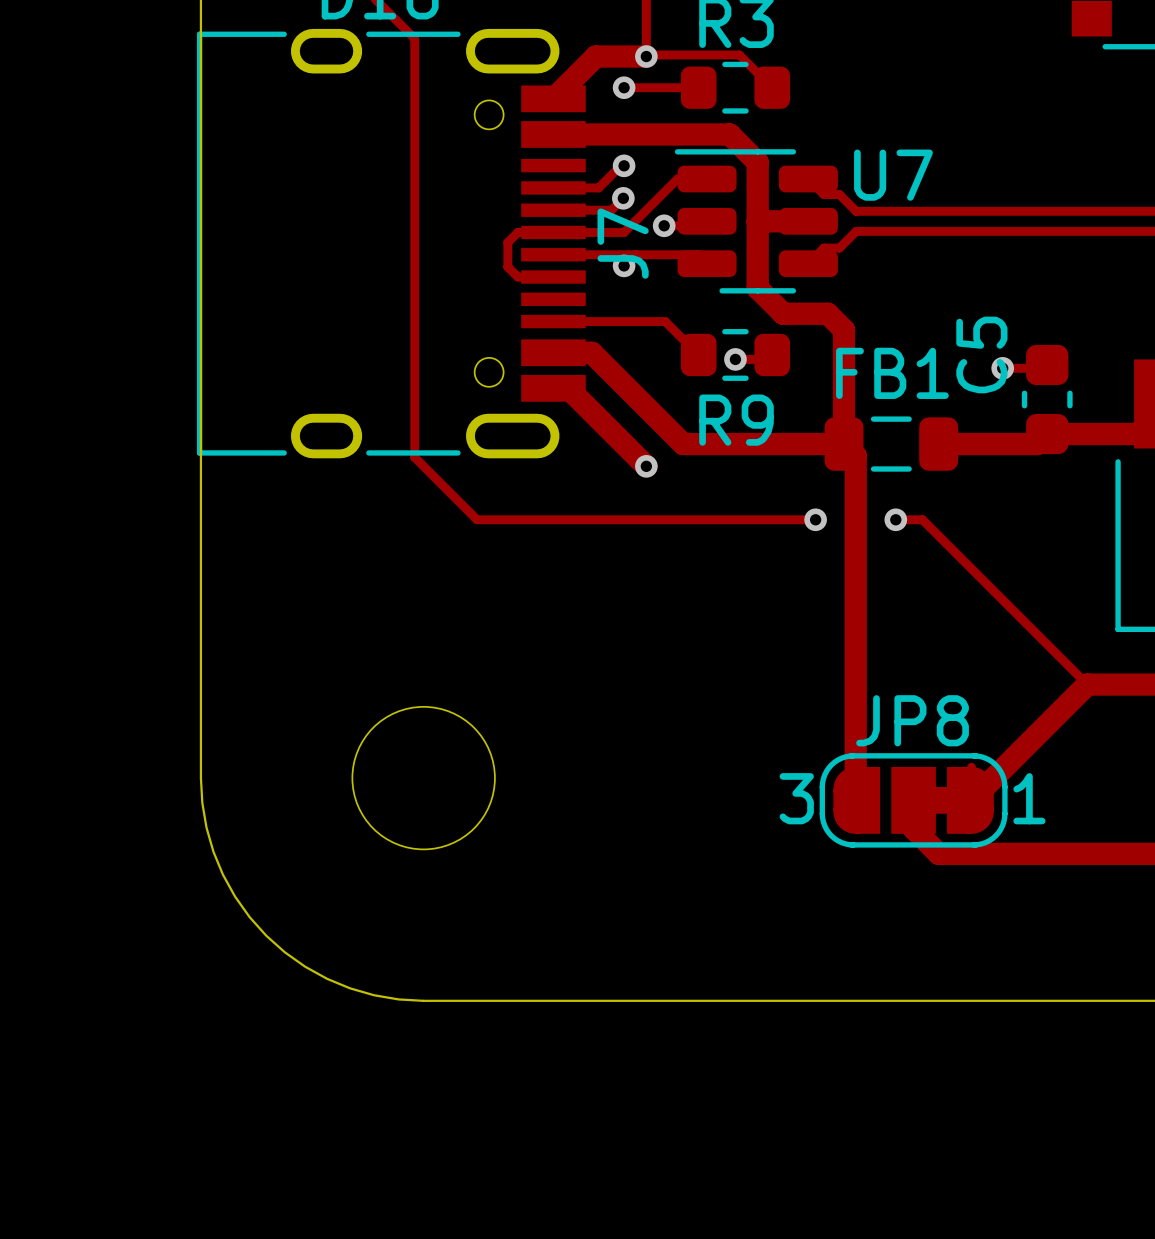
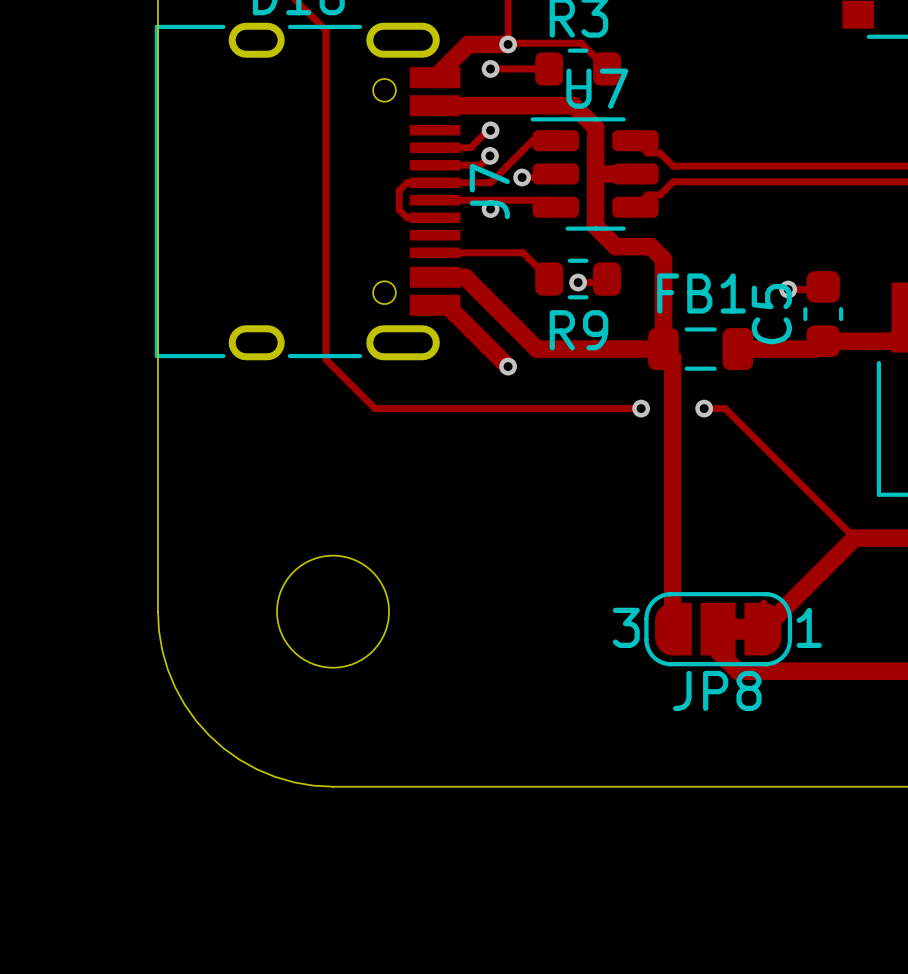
U7 name position: U7 (893, 175) -> U7 (597, 88)
C5 name position: C5 (981, 354) -> C5 (771, 314)
JP8 name position: JP8 (912, 720) -> JP8 (717, 690)

